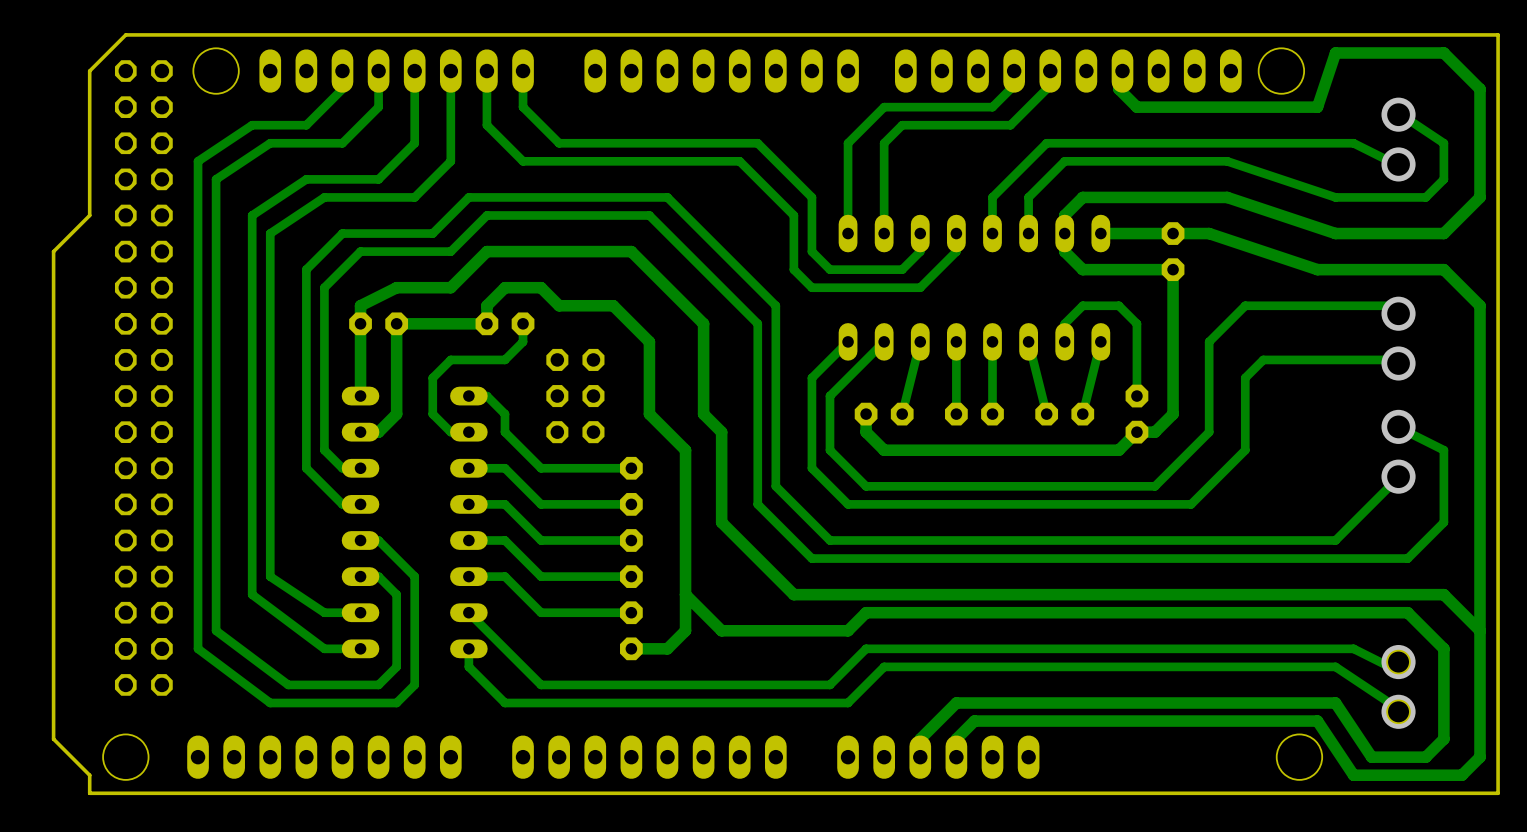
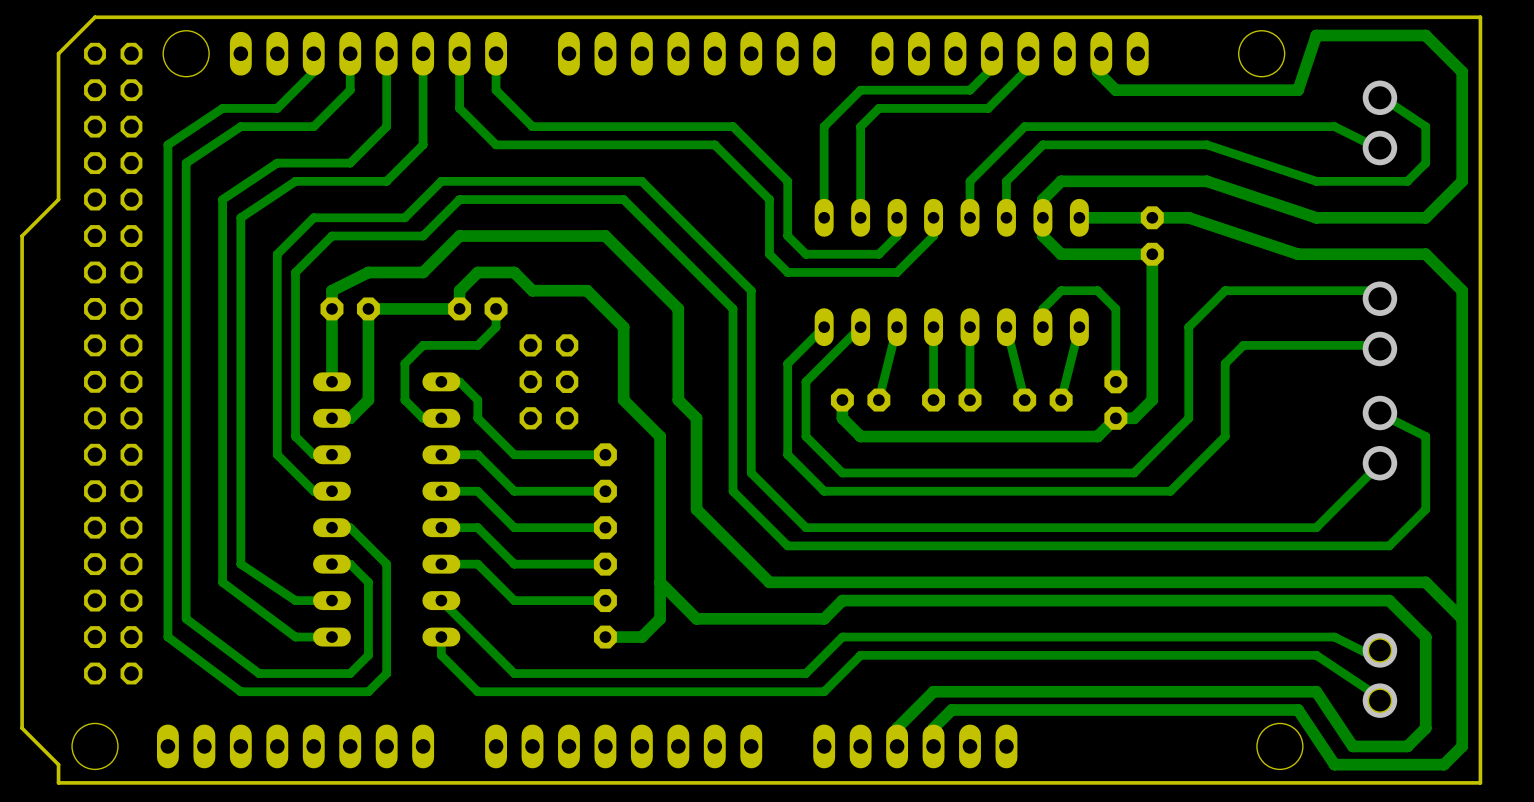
part: (1212, 71) -> none

